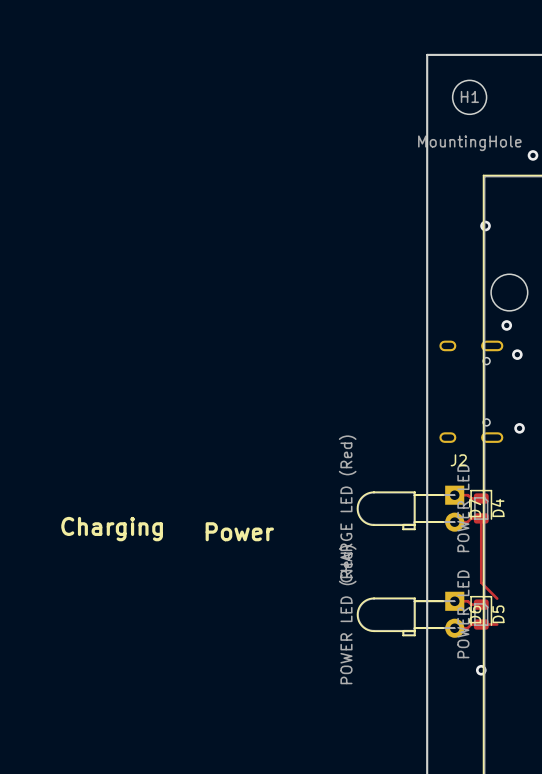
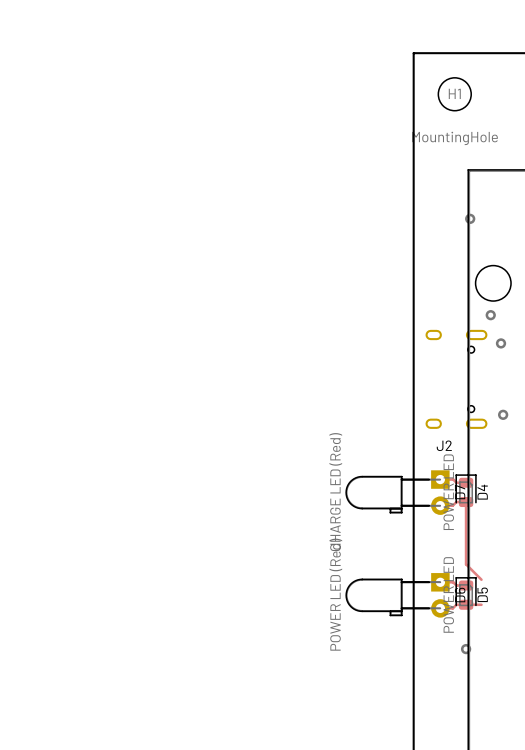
via: (533, 155) -> none
text: Charging (112, 529) -> none
text: Power (239, 531) -> none

